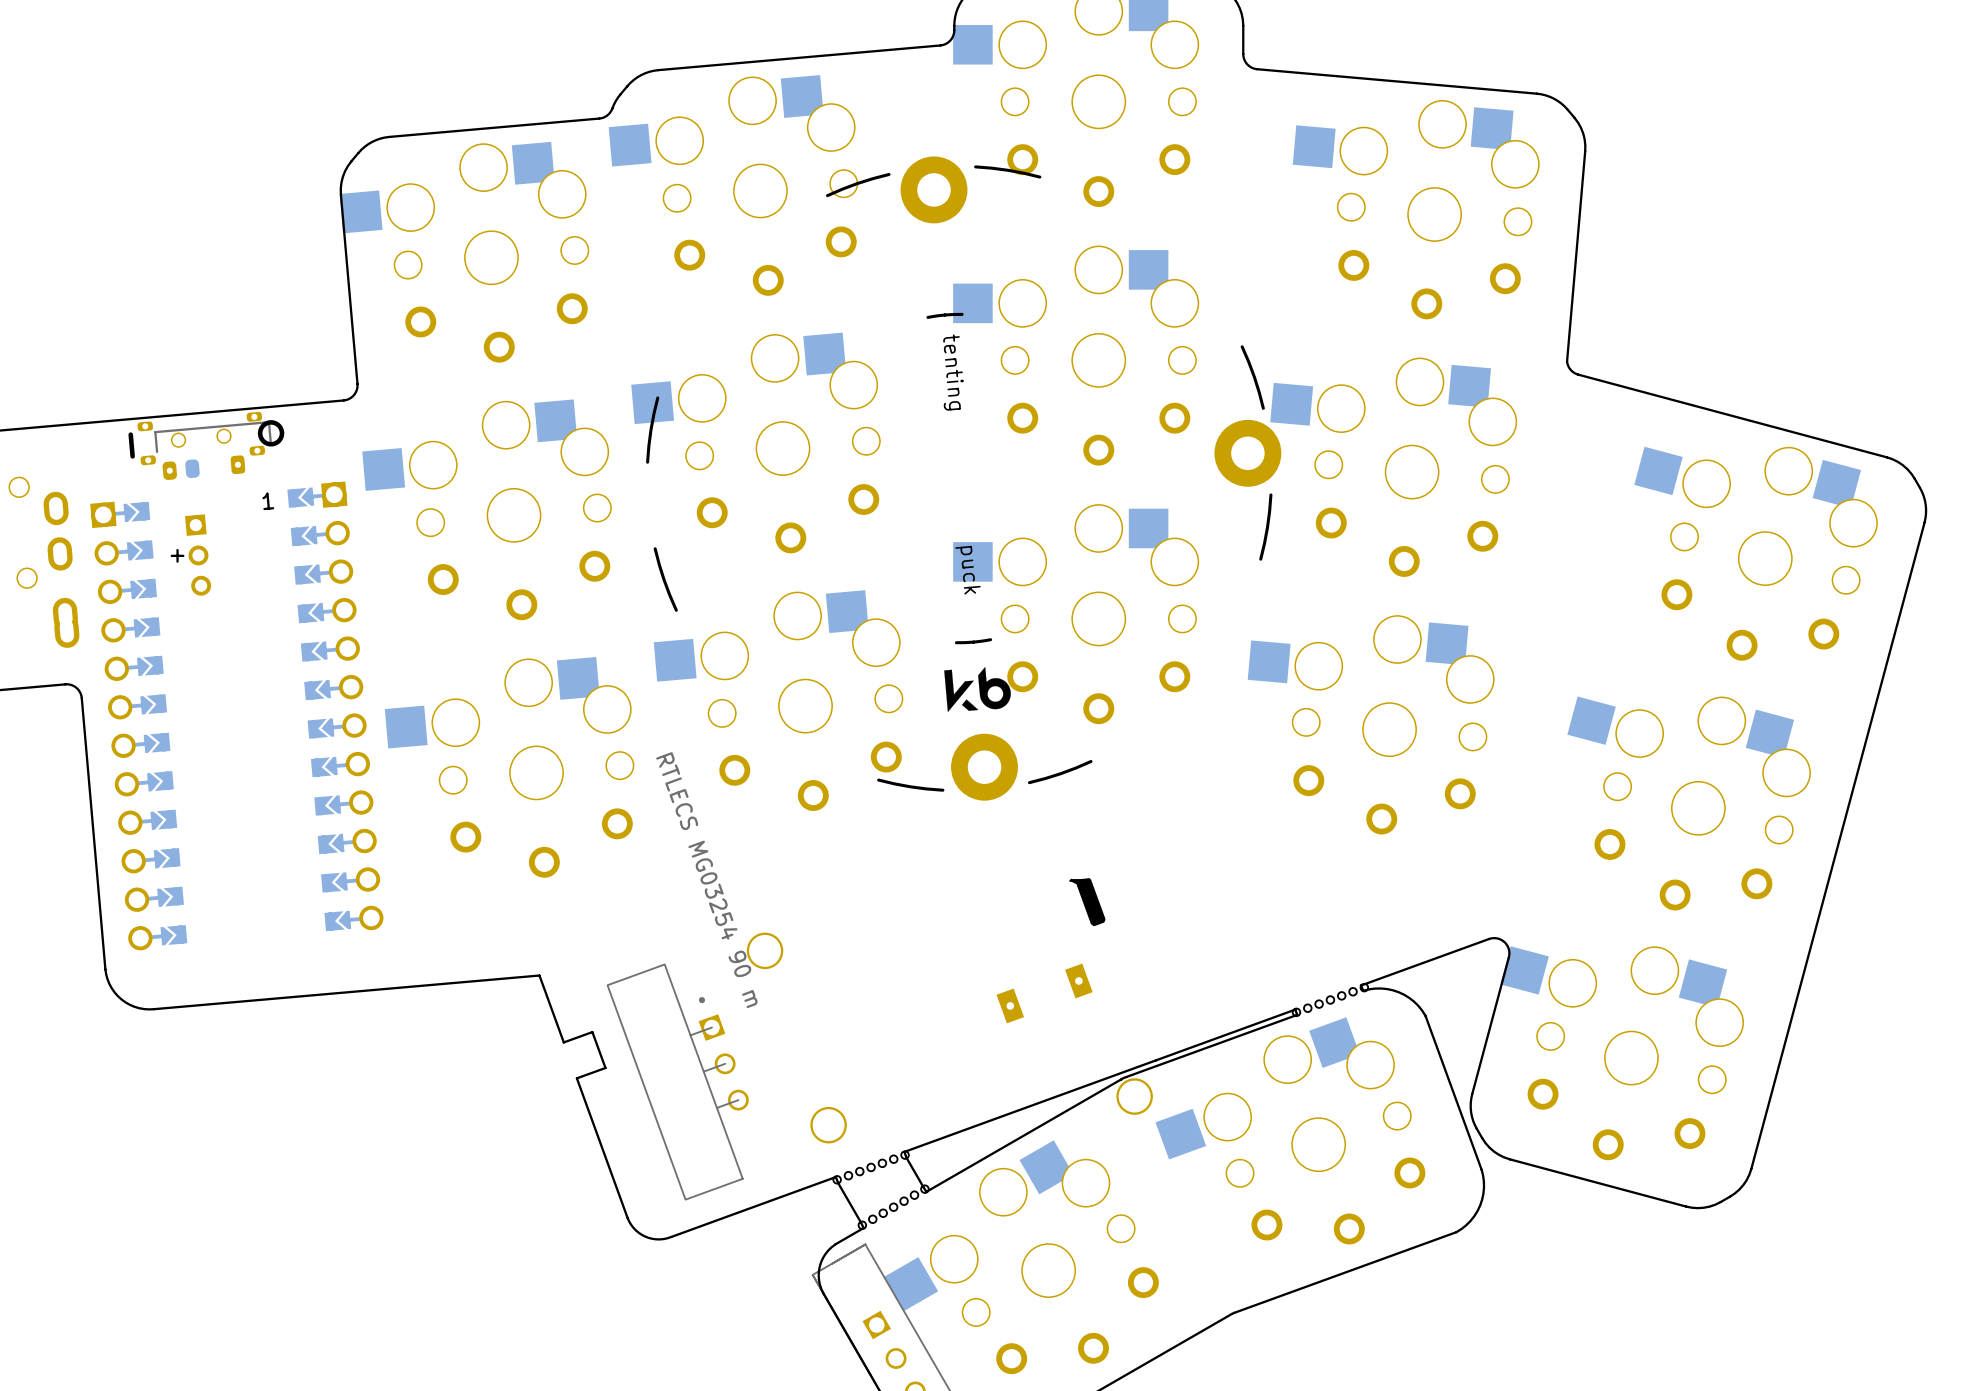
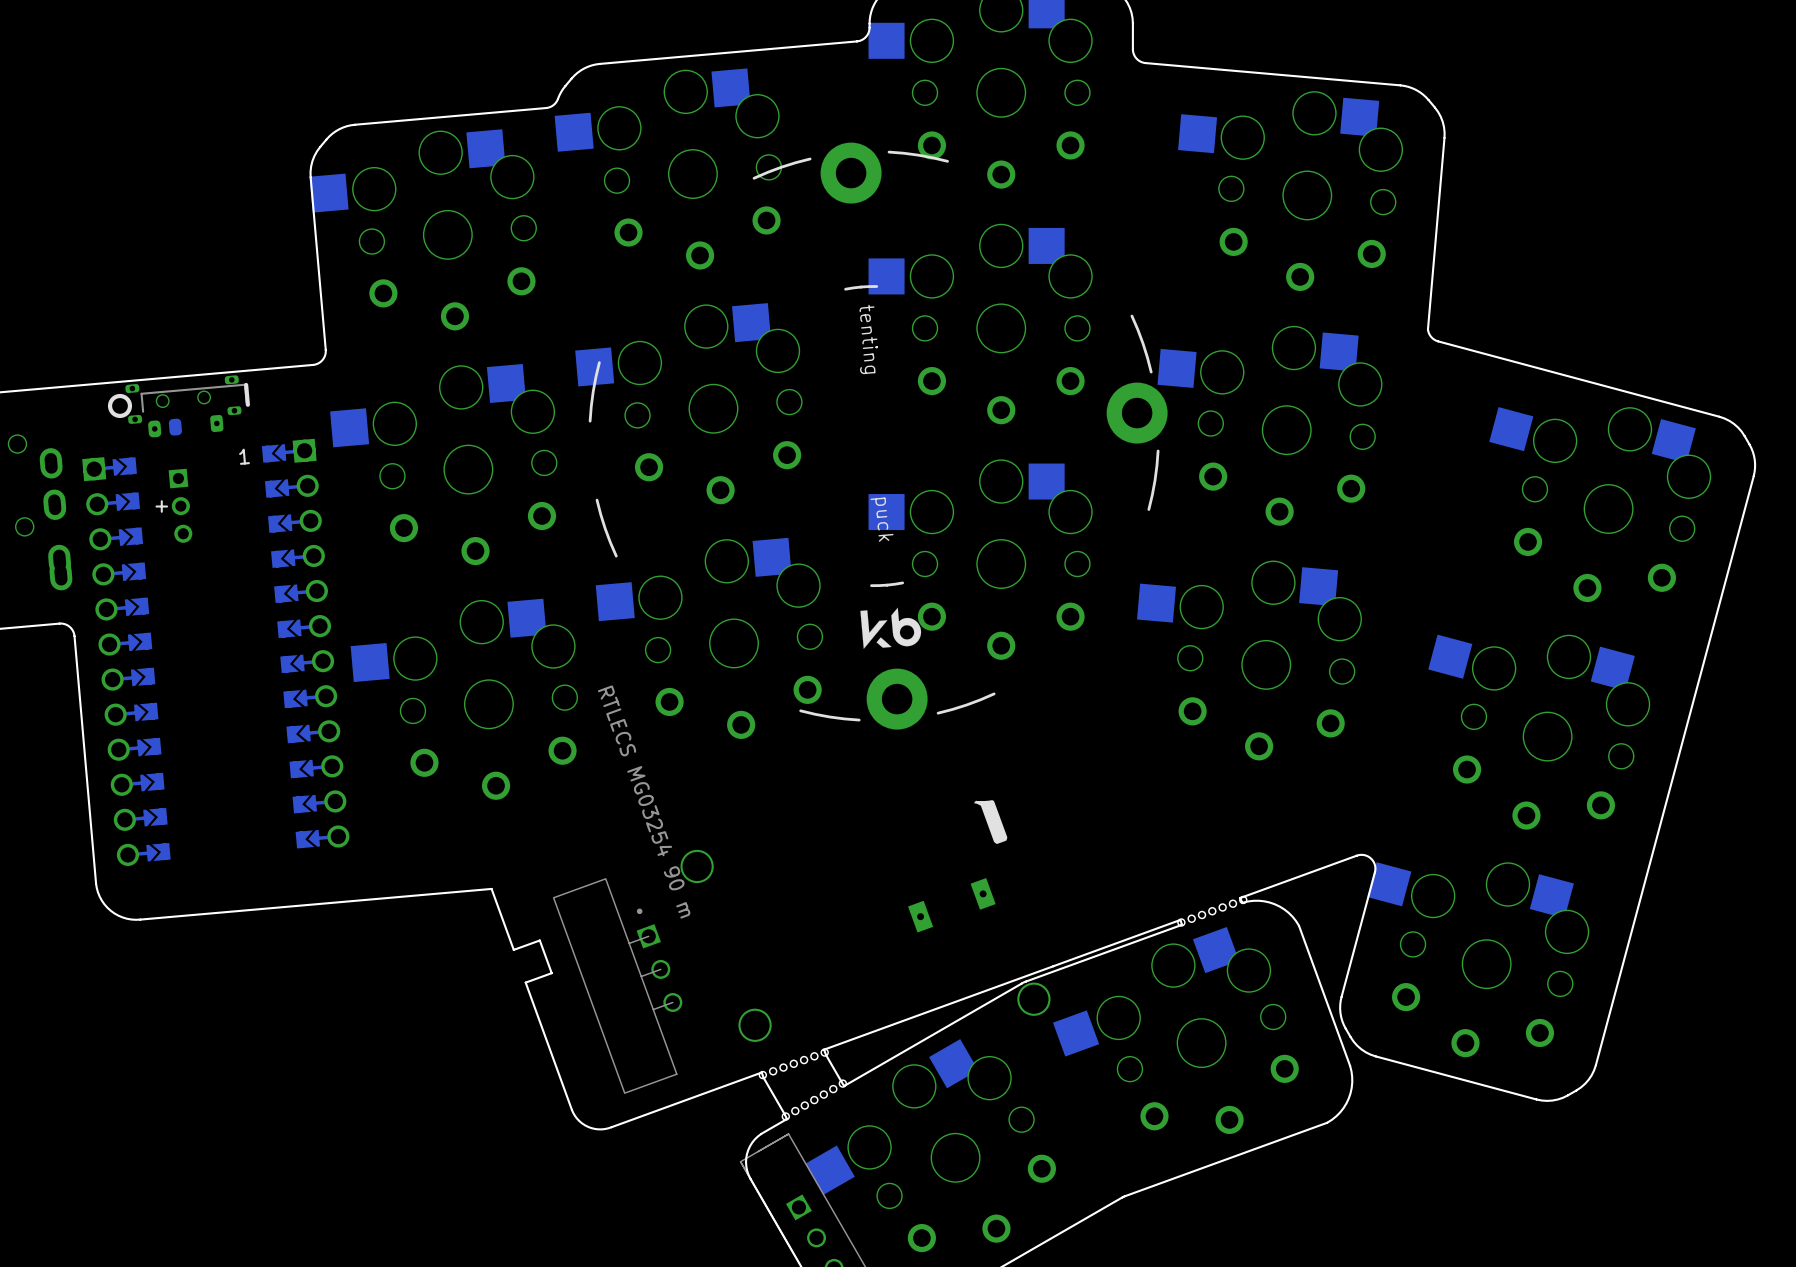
part footprint: [128, 411, 285, 481] -> [107, 375, 250, 438]

